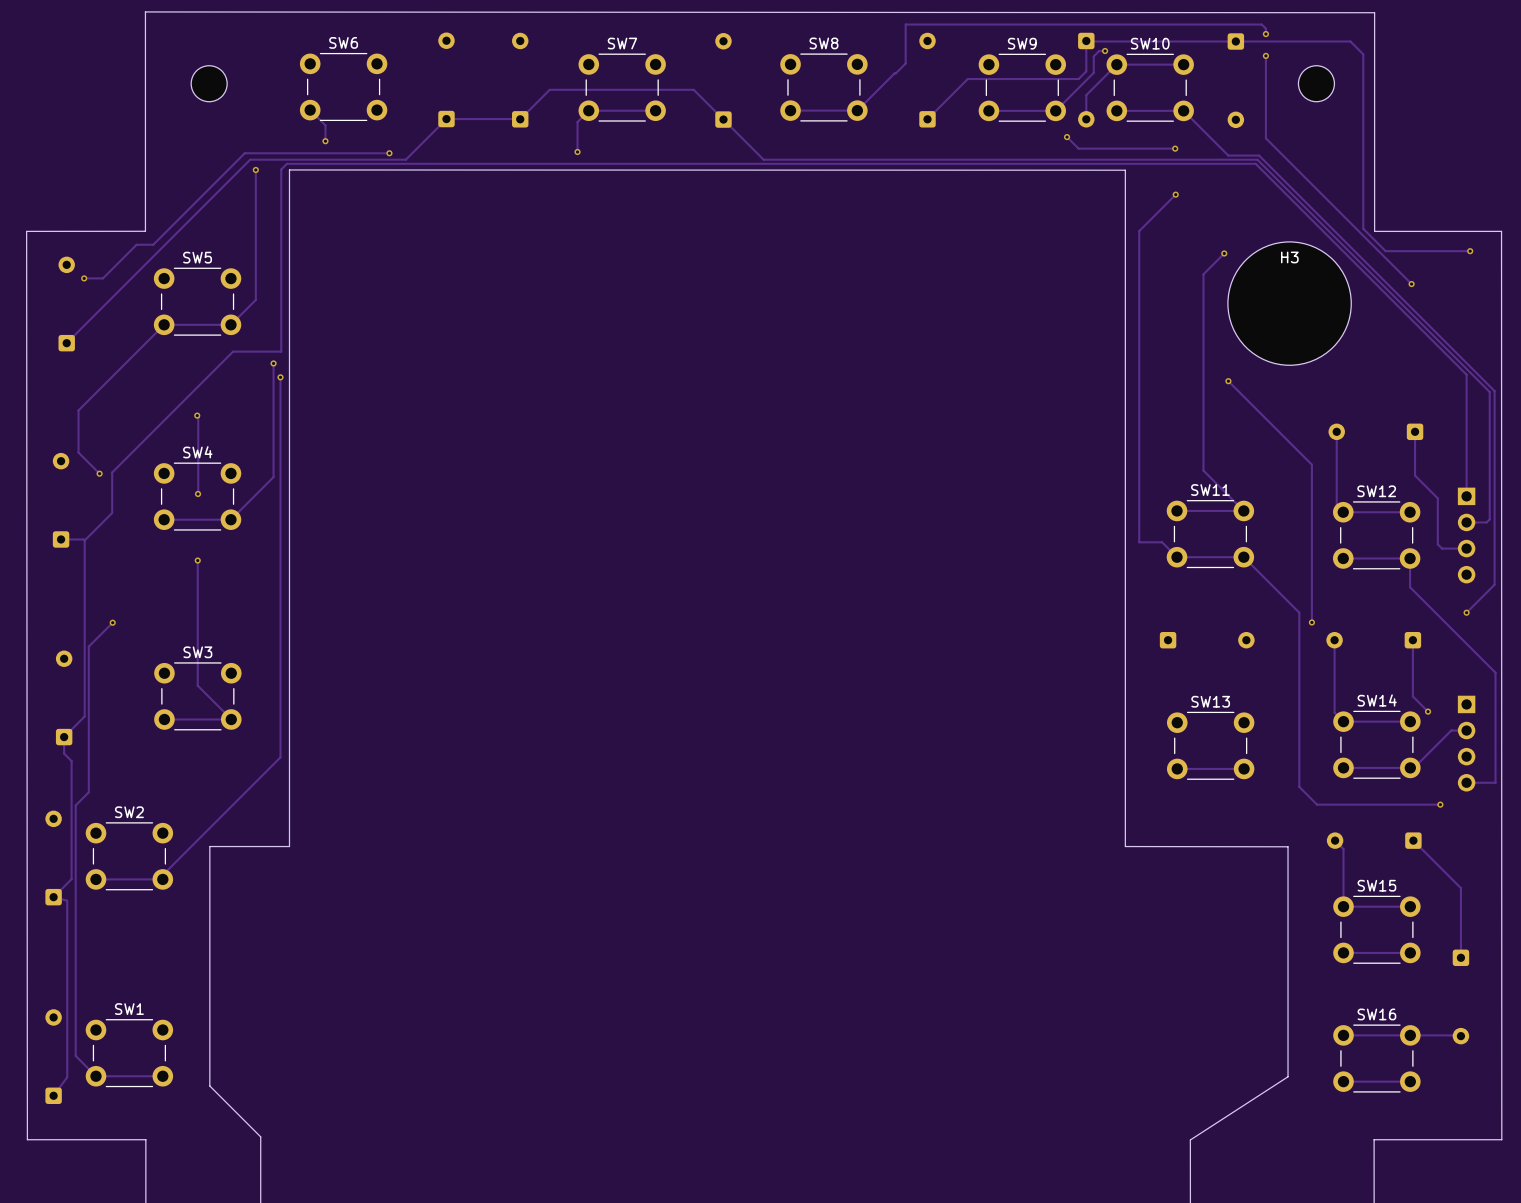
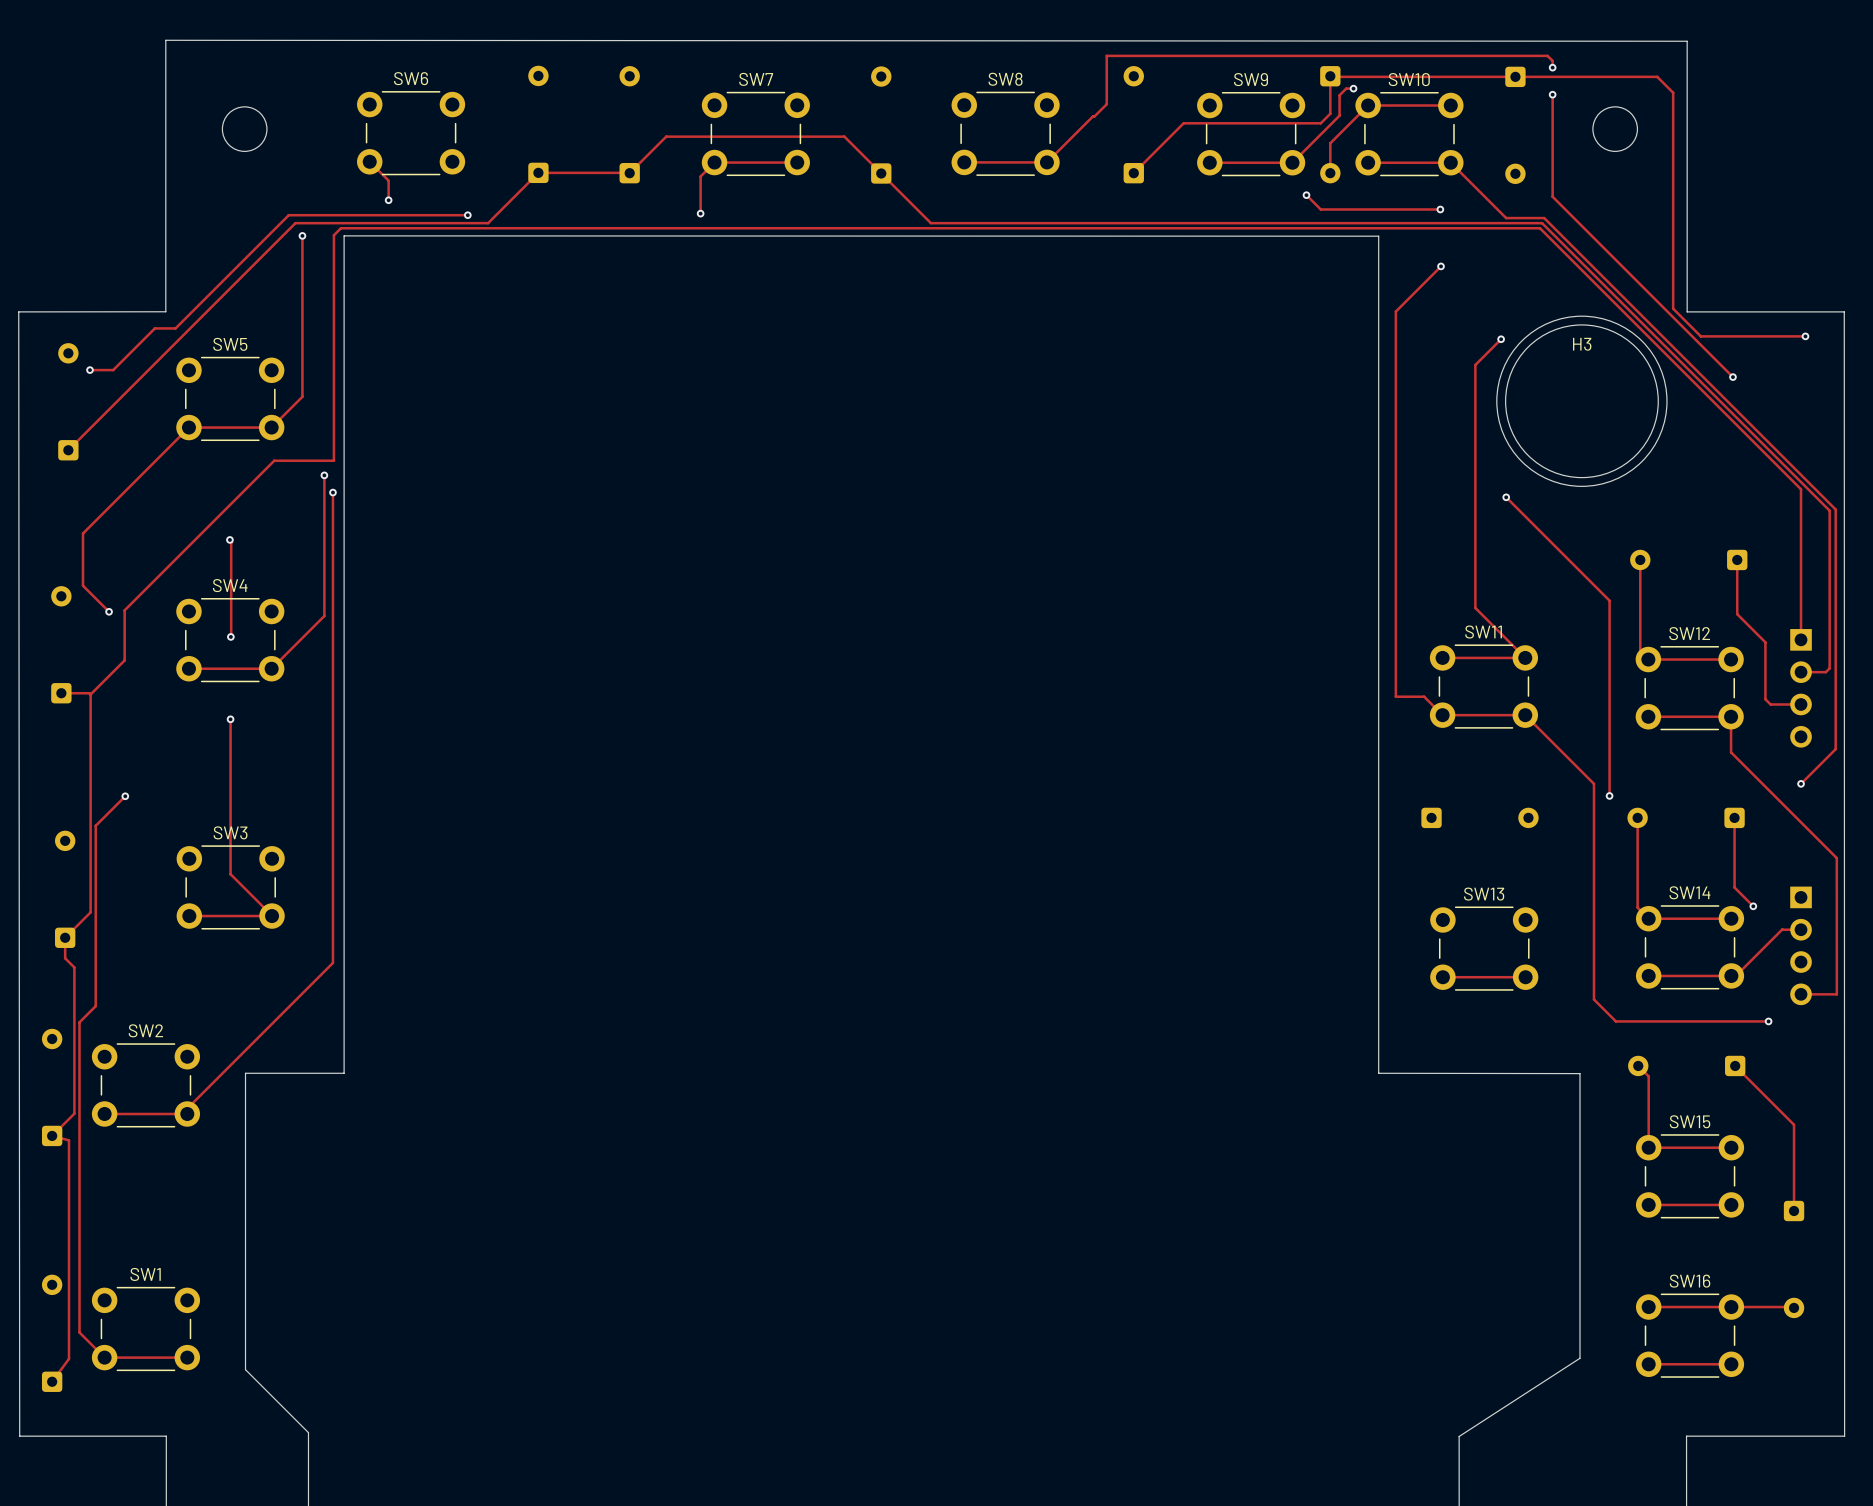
round board edge: none -> [1496, 315, 1668, 487]

